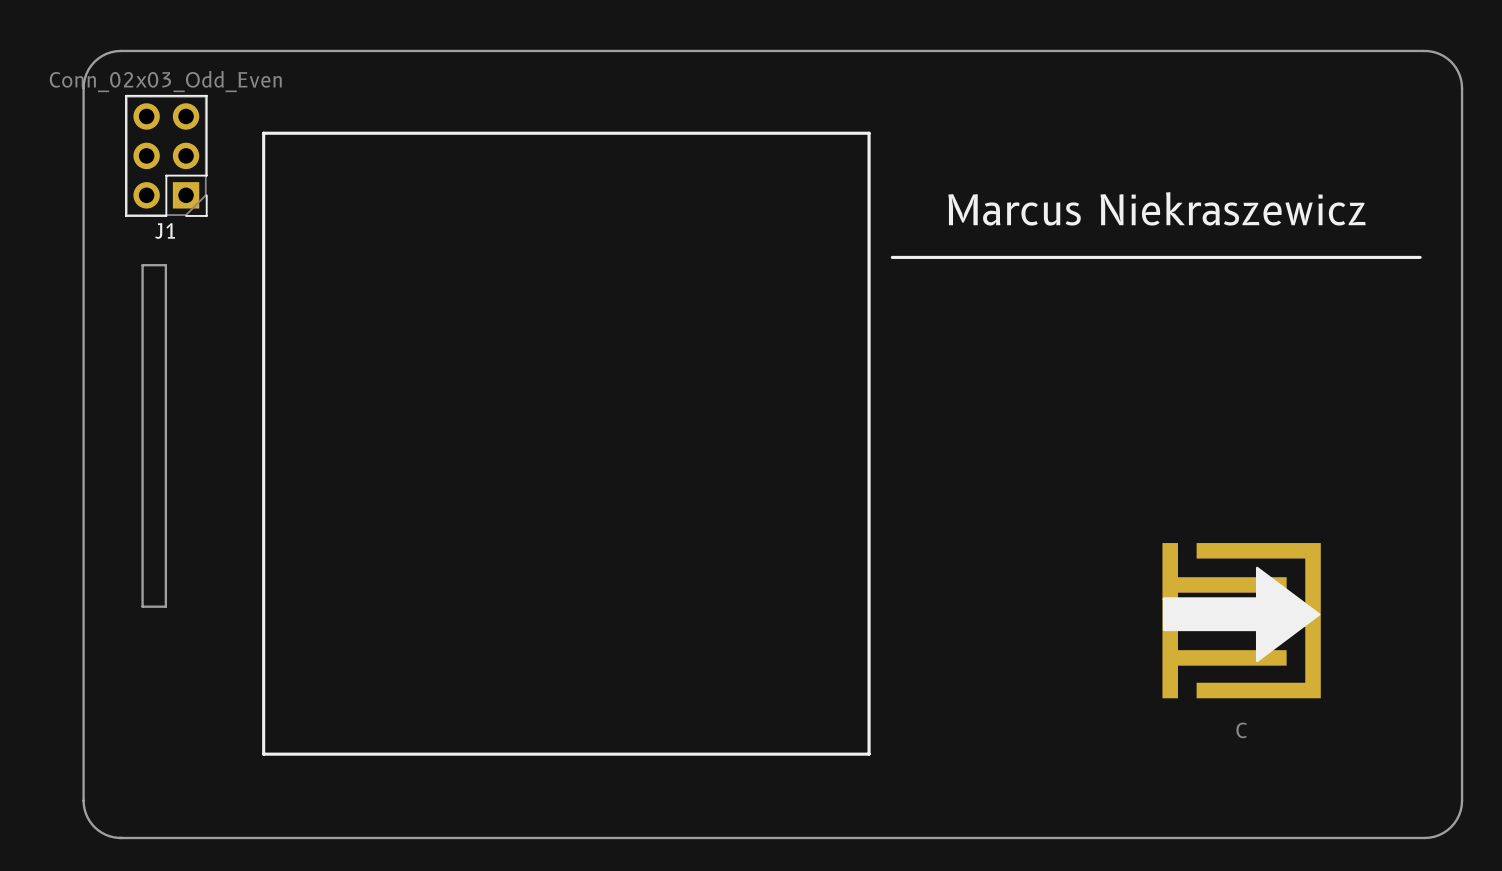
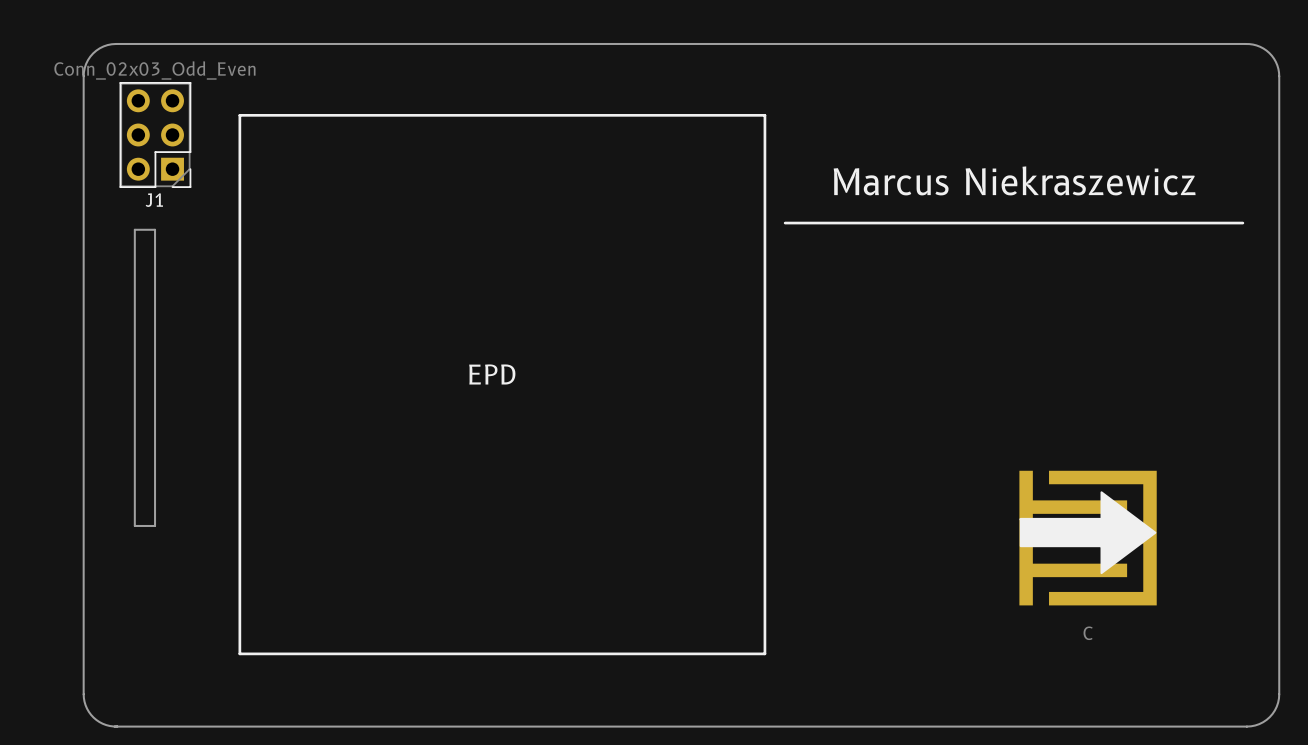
text: none -> EPD (492, 374)

